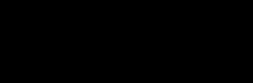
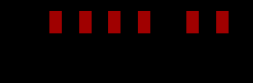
part: none -> (70, 22)
part: none -> (129, 22)
part: none -> (207, 22)

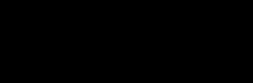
part: (70, 22) -> none
part: (129, 22) -> none
part: (207, 22) -> none

